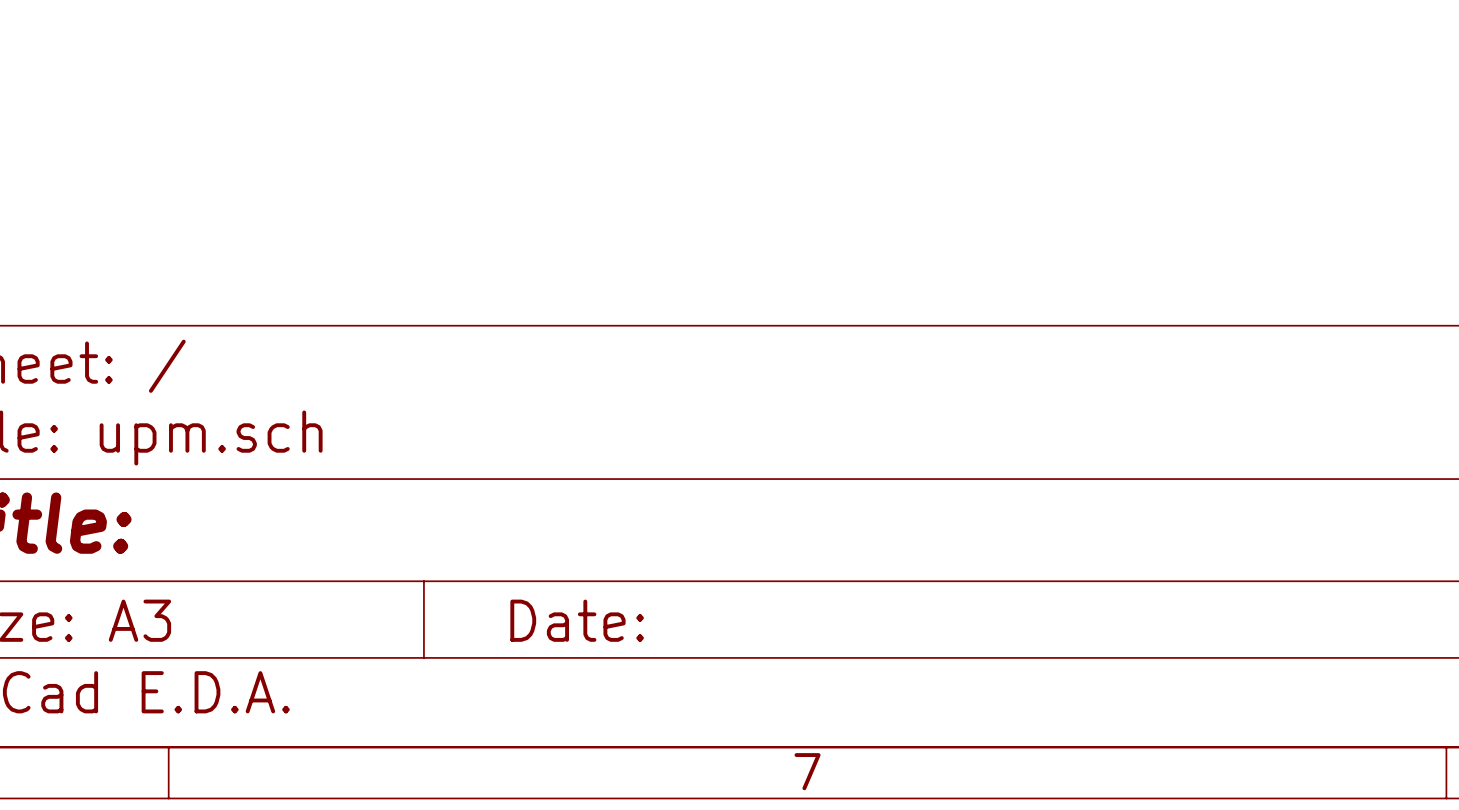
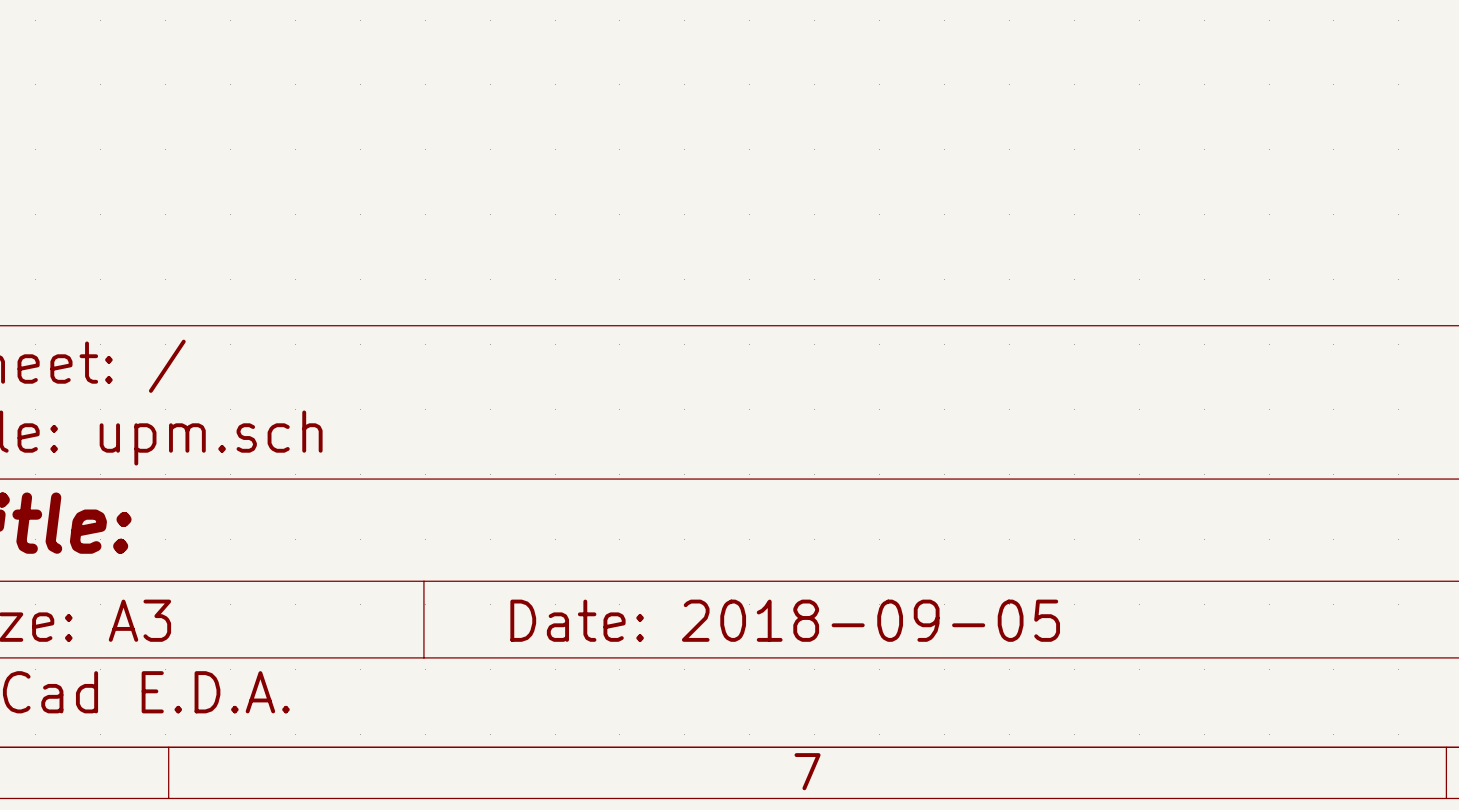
title block: Date: (577, 620) -> Date: 2018-09-05 (785, 620)

